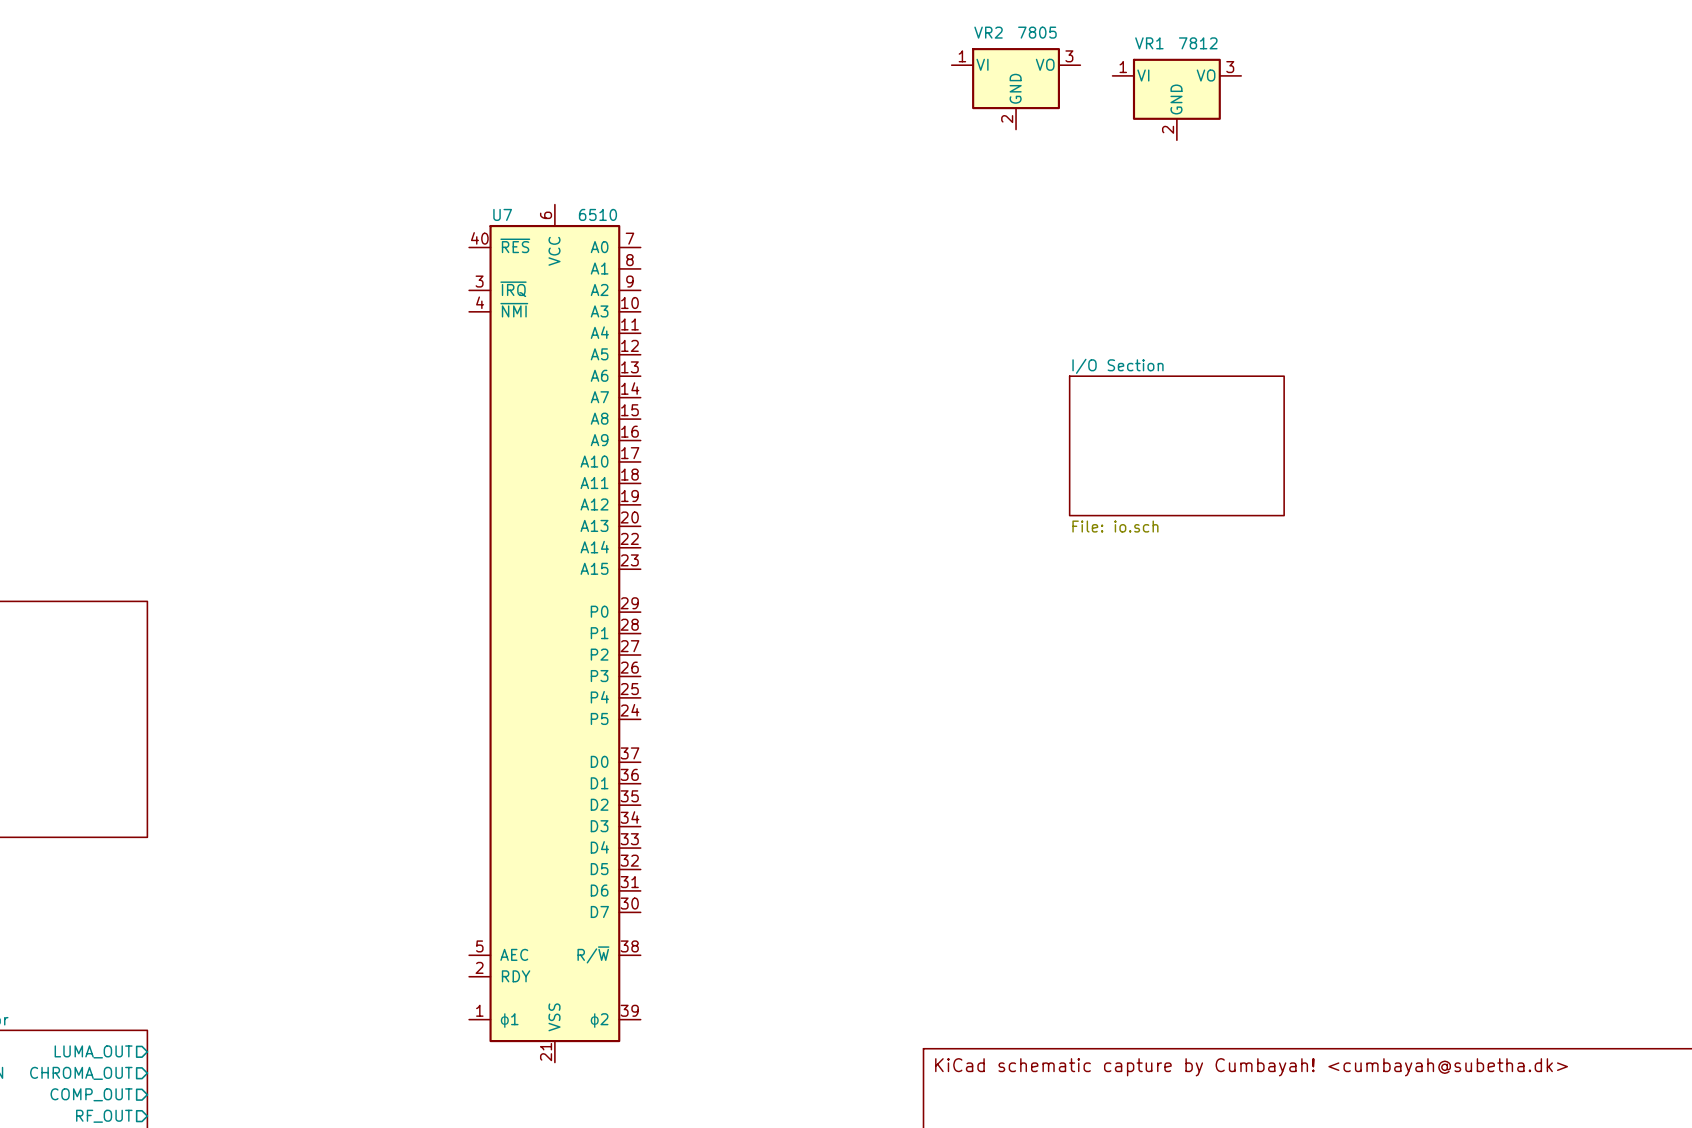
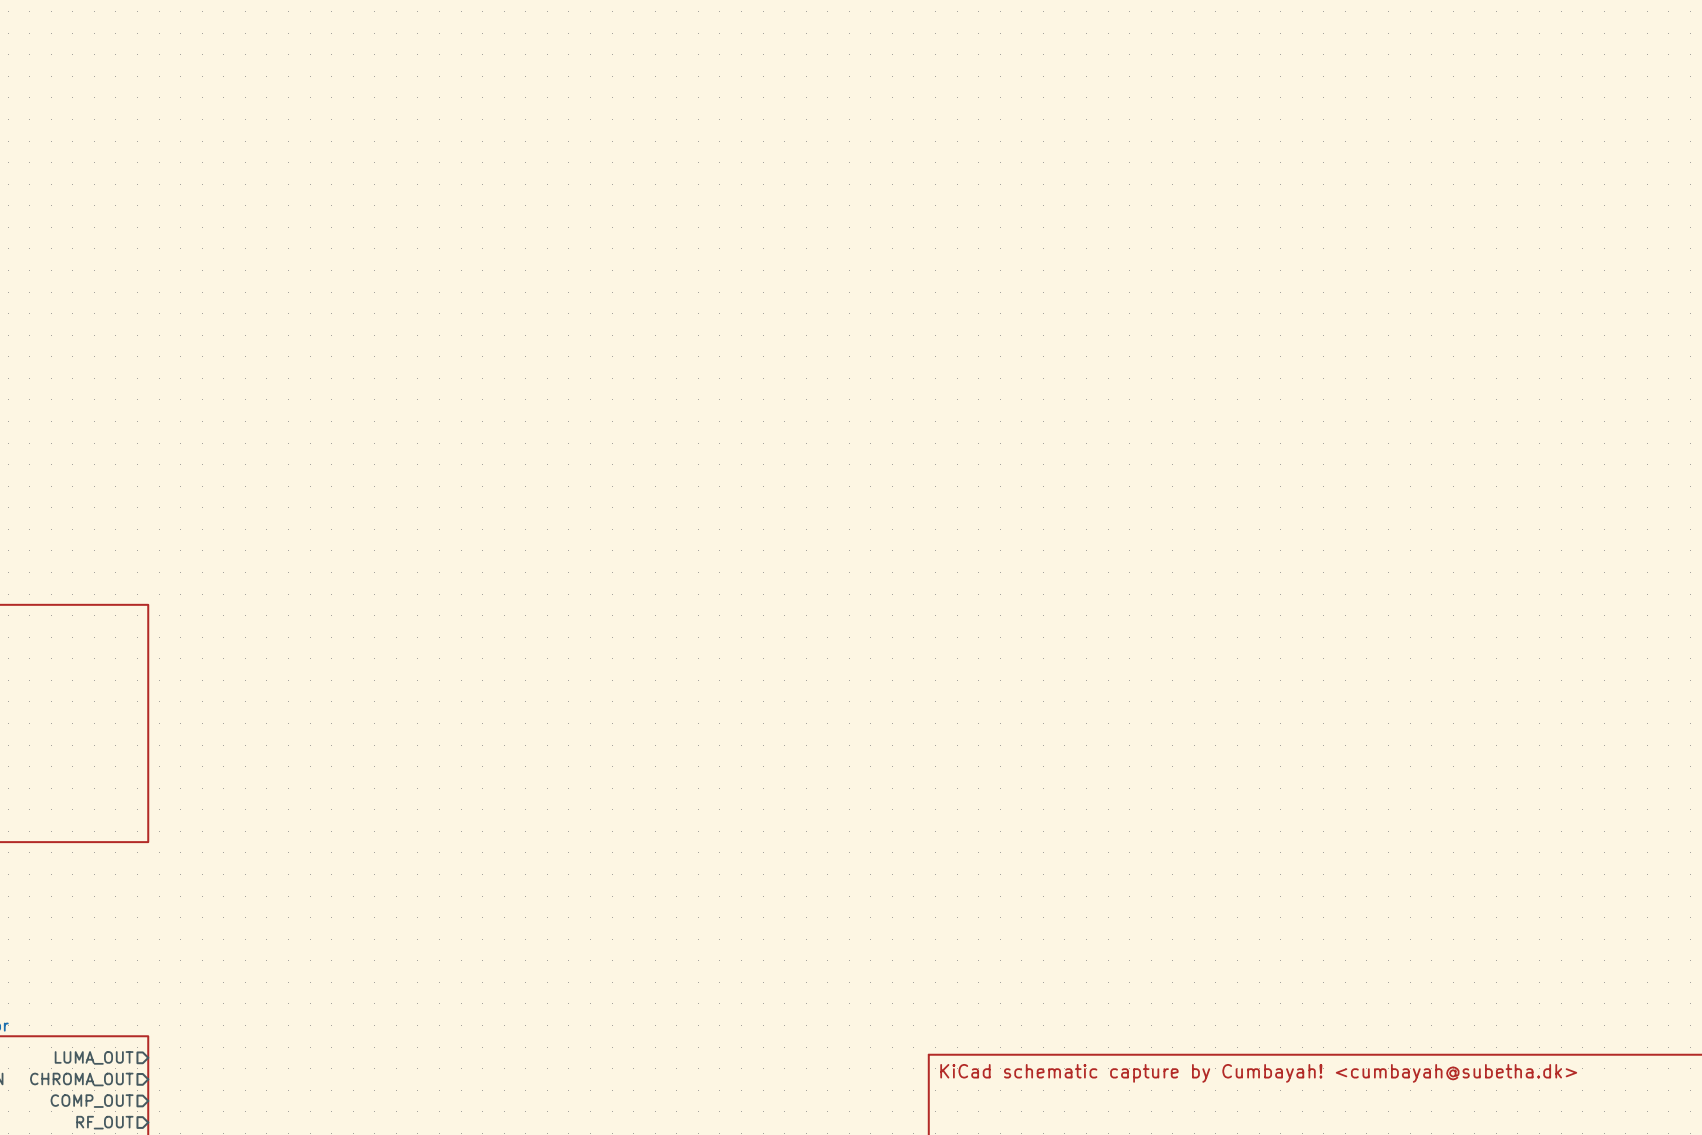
VR2: 7805 (1016, 88) -> none
VR1: 7812 (1176, 99) -> none
sheet I/O Section: File: io.sch (1176, 445) -> none
U7: 6510 (554, 633) -> none

